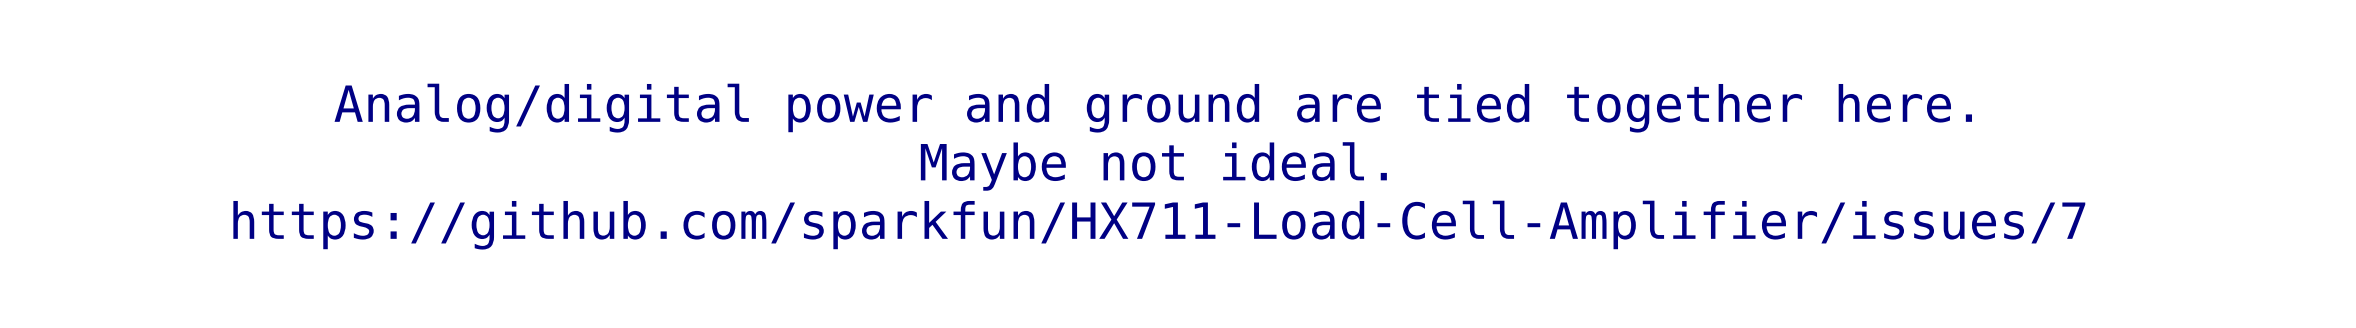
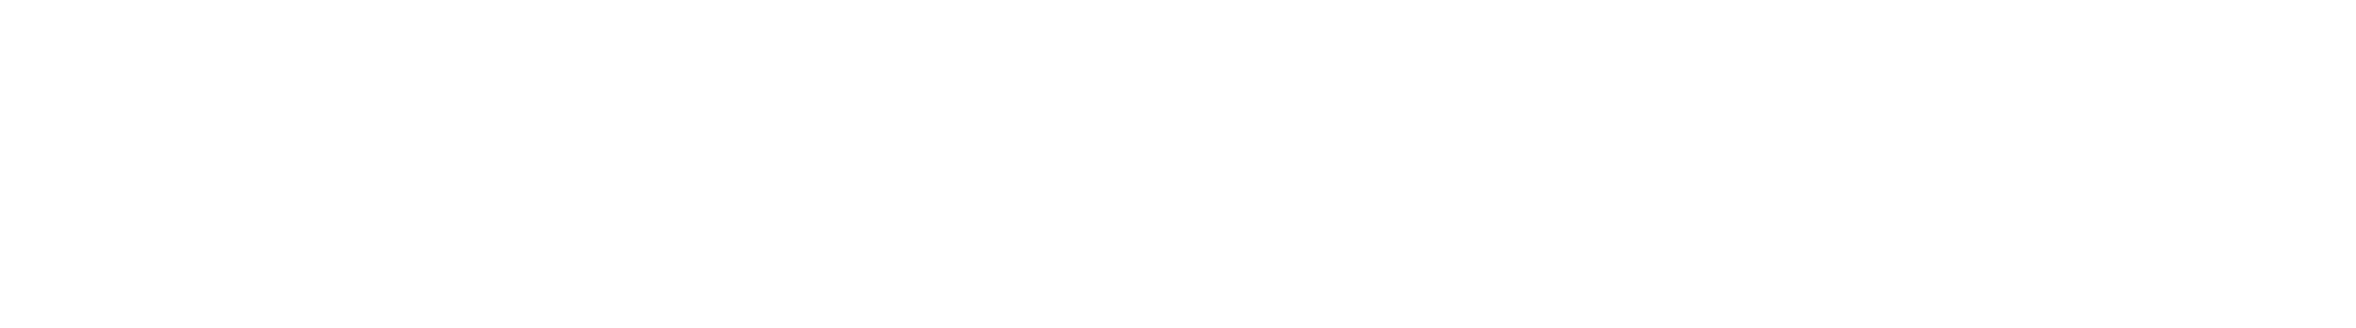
text: Analog/digital power and ground are tied together here. (1153, 108) -> none
text: Maybe not ideal. (1153, 166) -> none
text: https://github.com/sparkfun/HX711-Load-Cell-Amplifier/issues/7 (1159, 225) -> none

